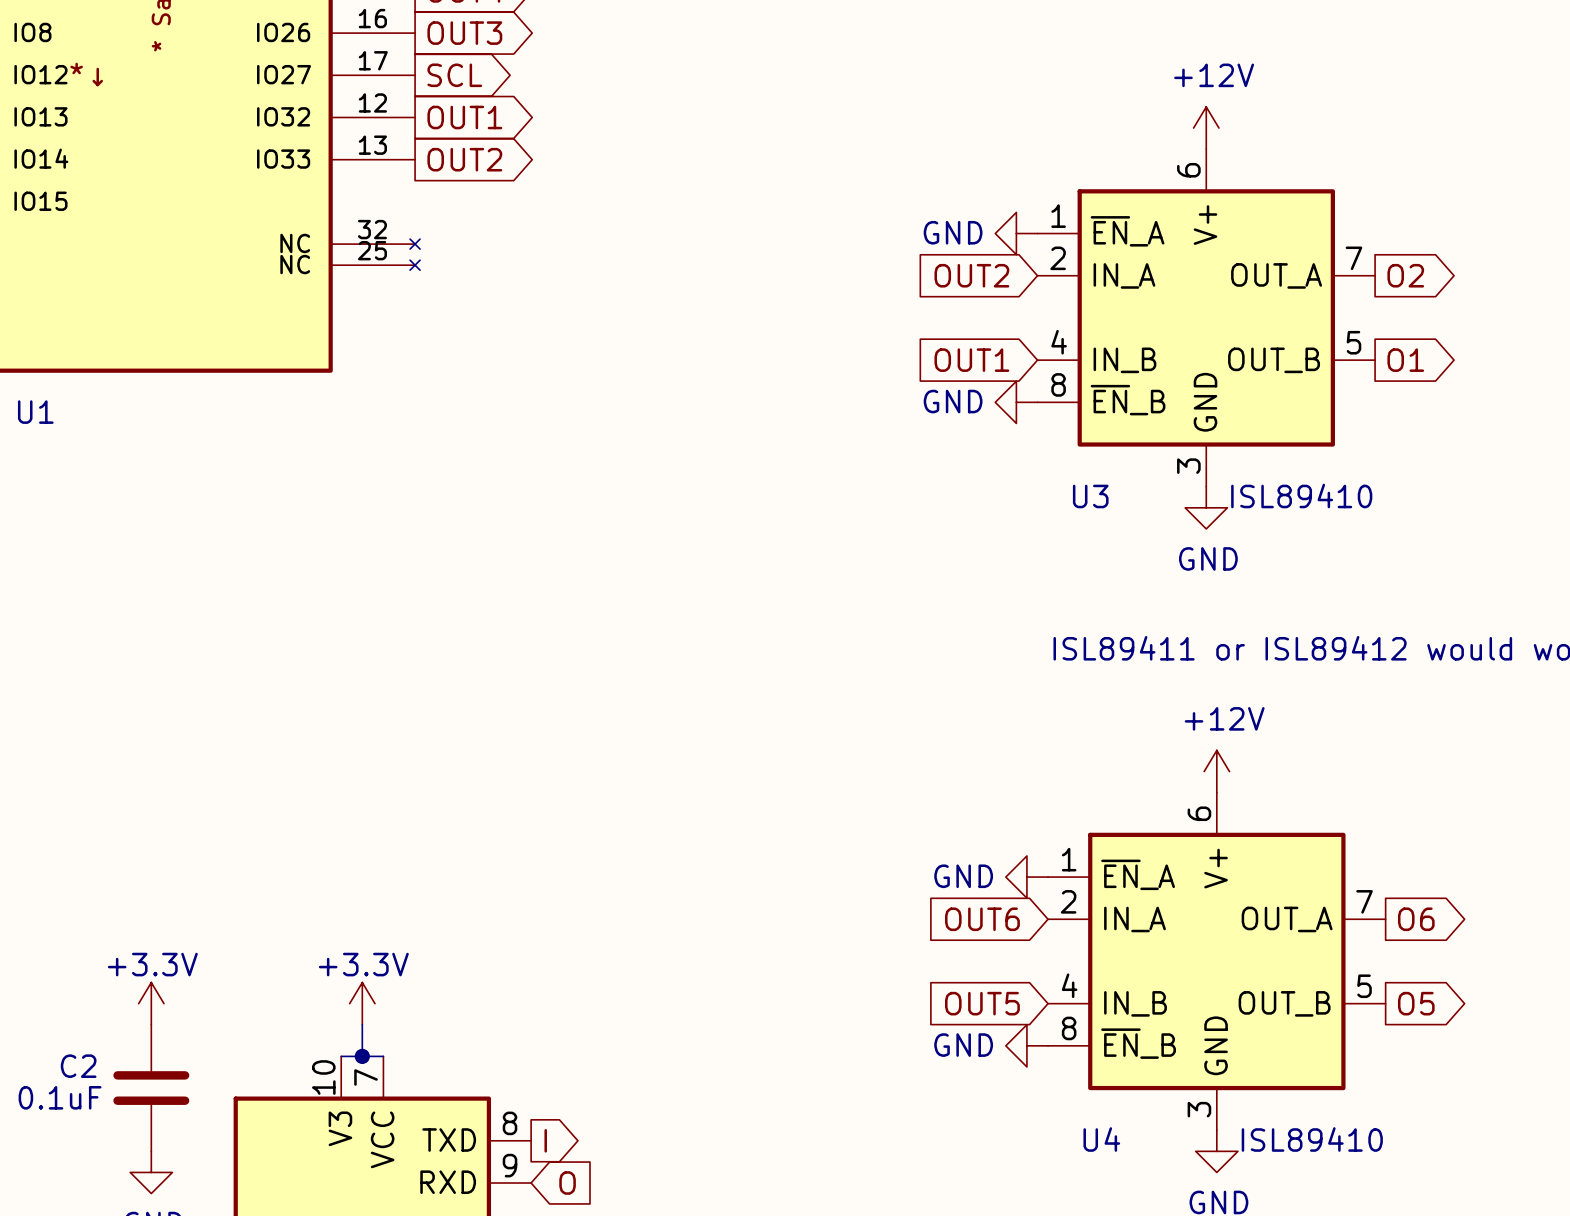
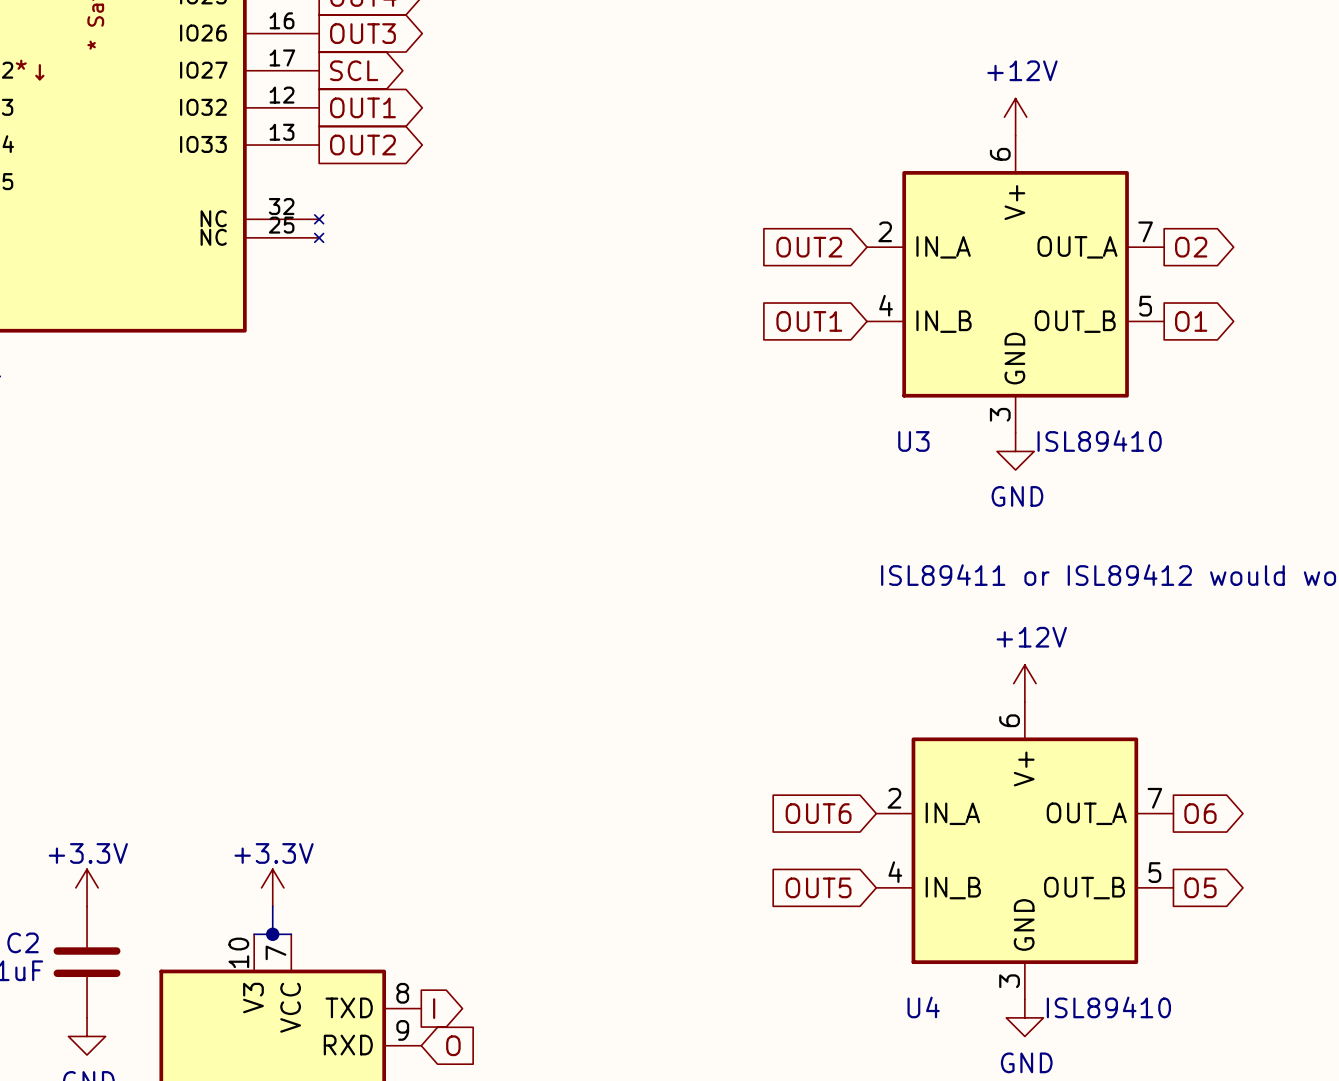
U3 symbol: [1037, 149, 1376, 487] -> [867, 135, 1165, 433]
power symbol: GND (1016, 233) -> none
power symbol: GND (1016, 402) -> none
U4 symbol: [1048, 792, 1386, 1131] -> [876, 702, 1174, 1000]
power symbol: GND (1026, 877) -> none
power symbol: GND (1026, 1045) -> none

